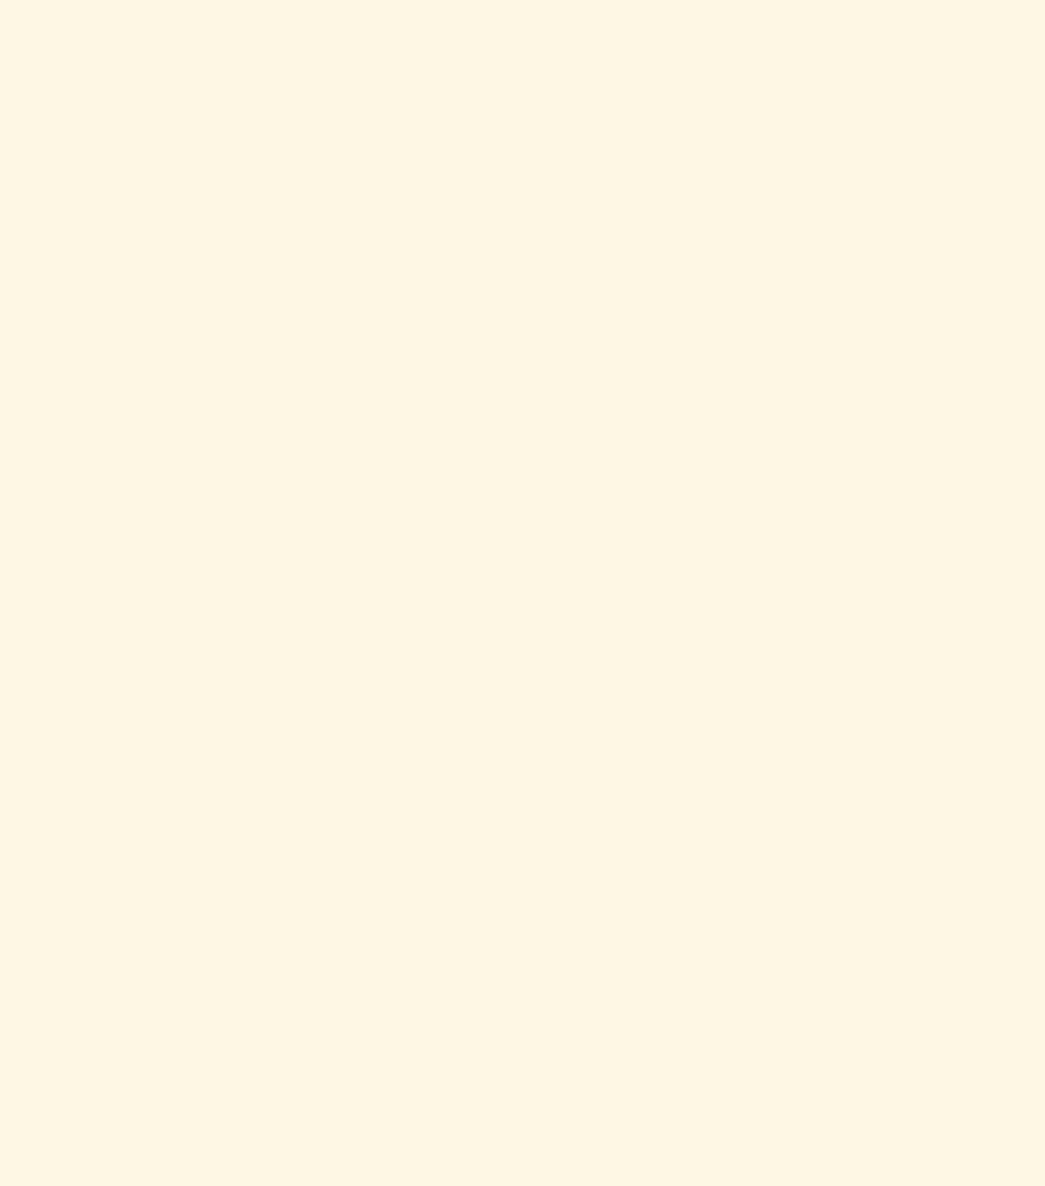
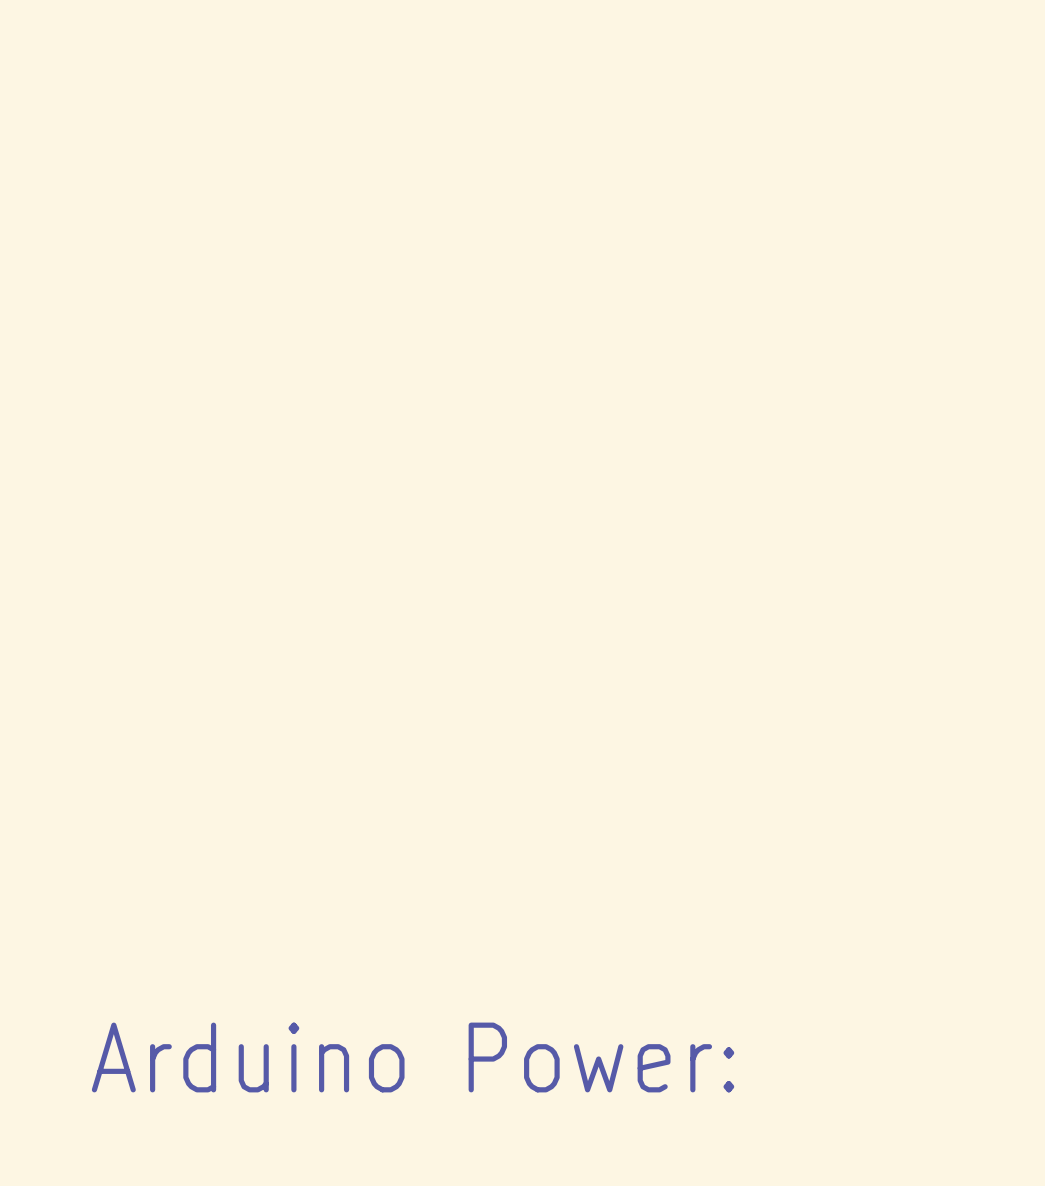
text: none -> Arduino Power: (413, 1057)

